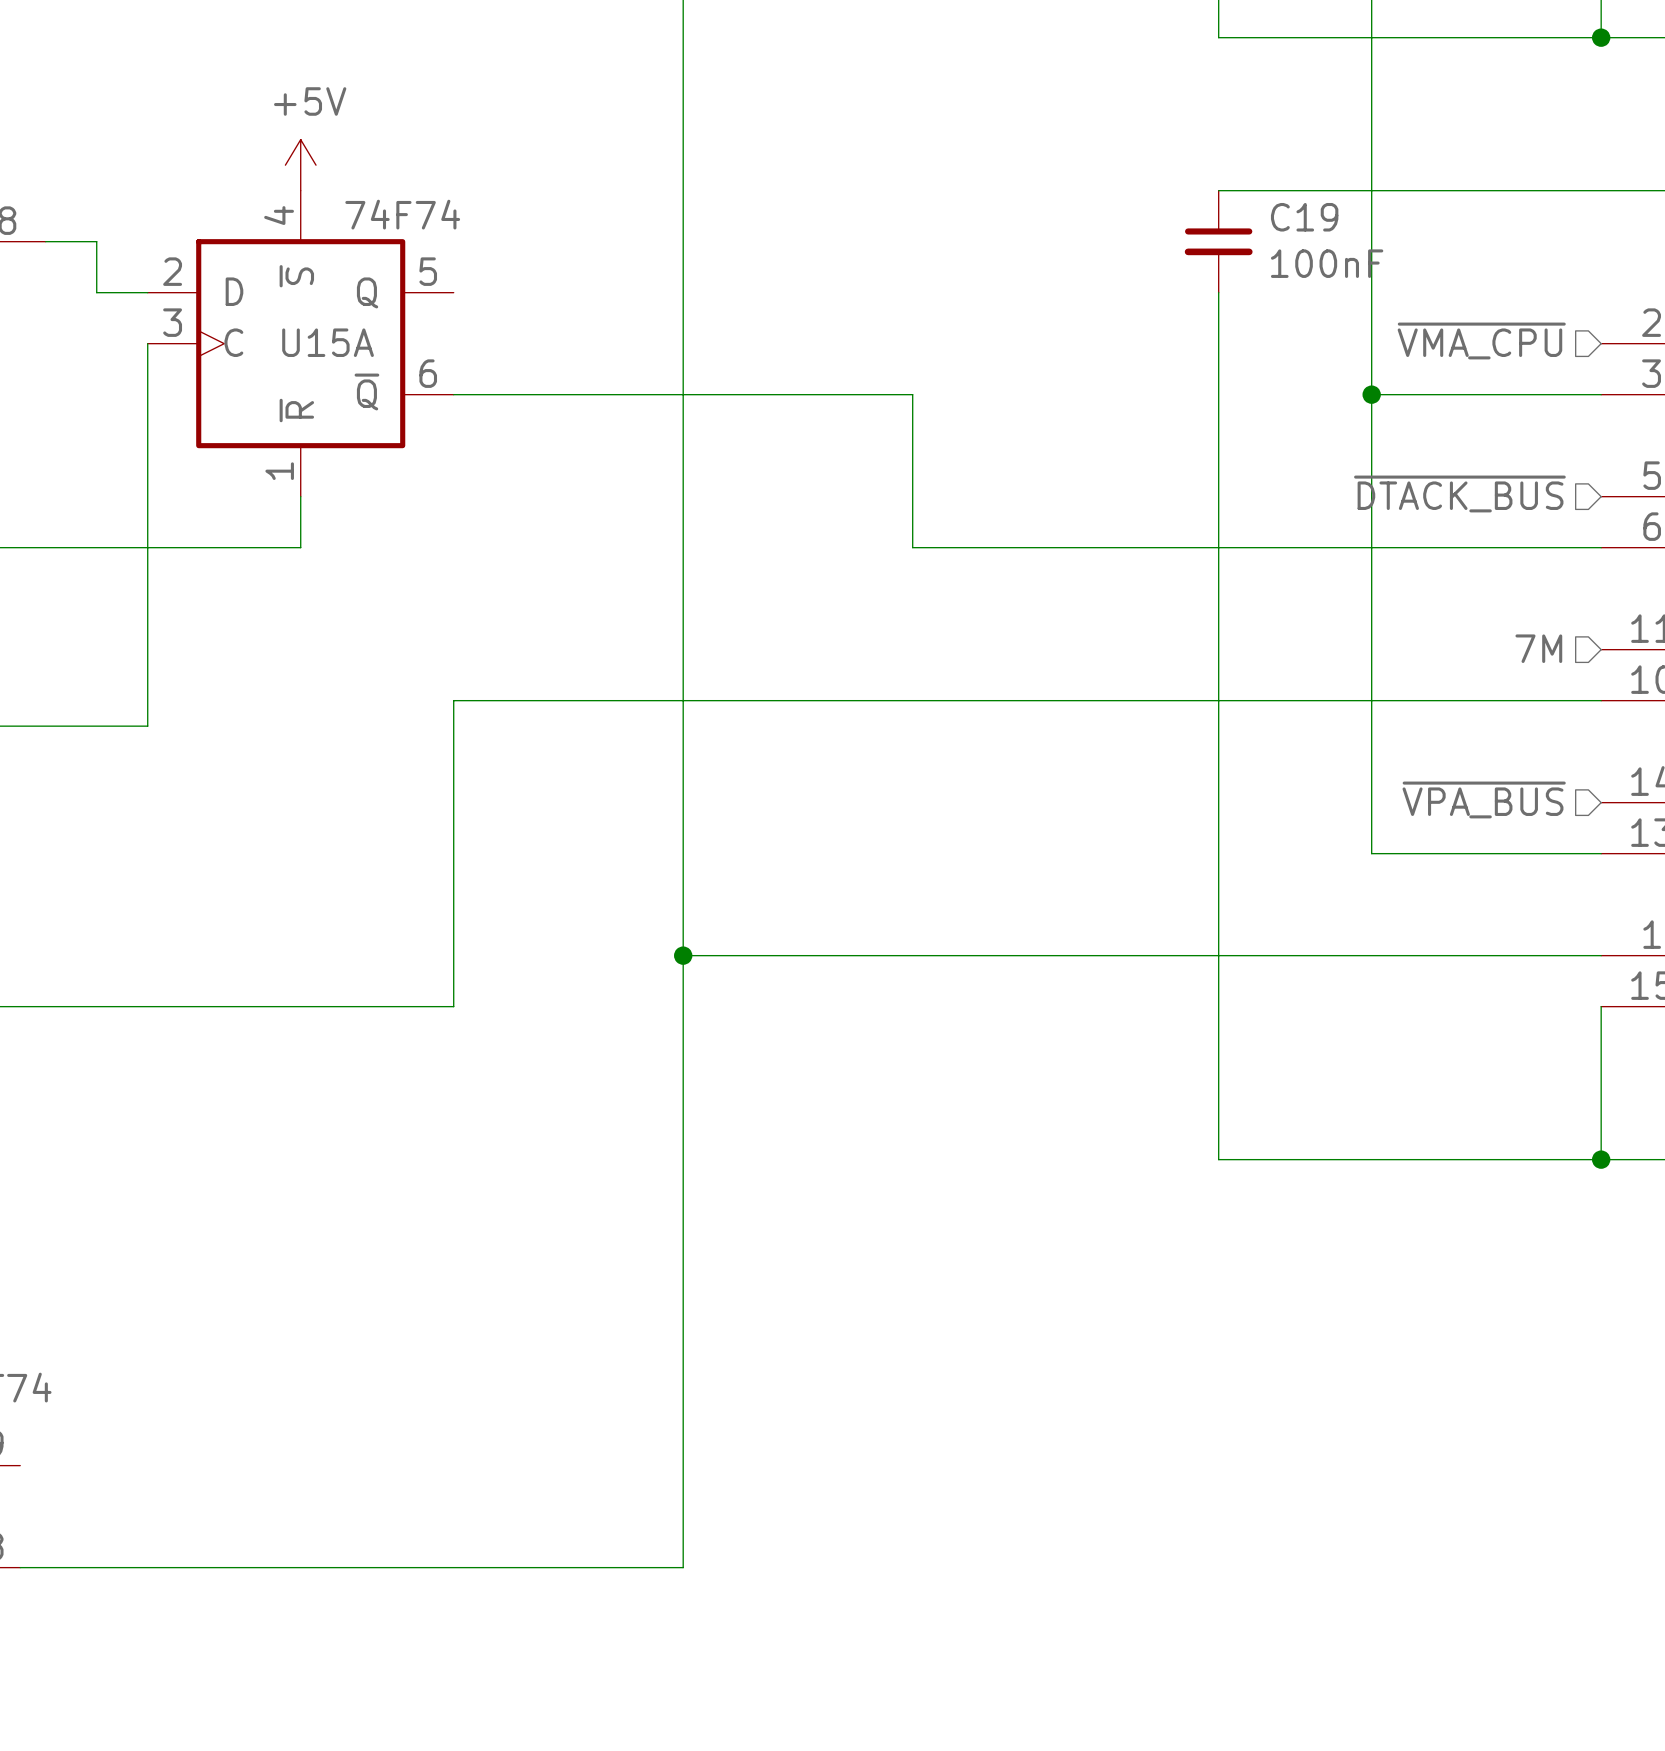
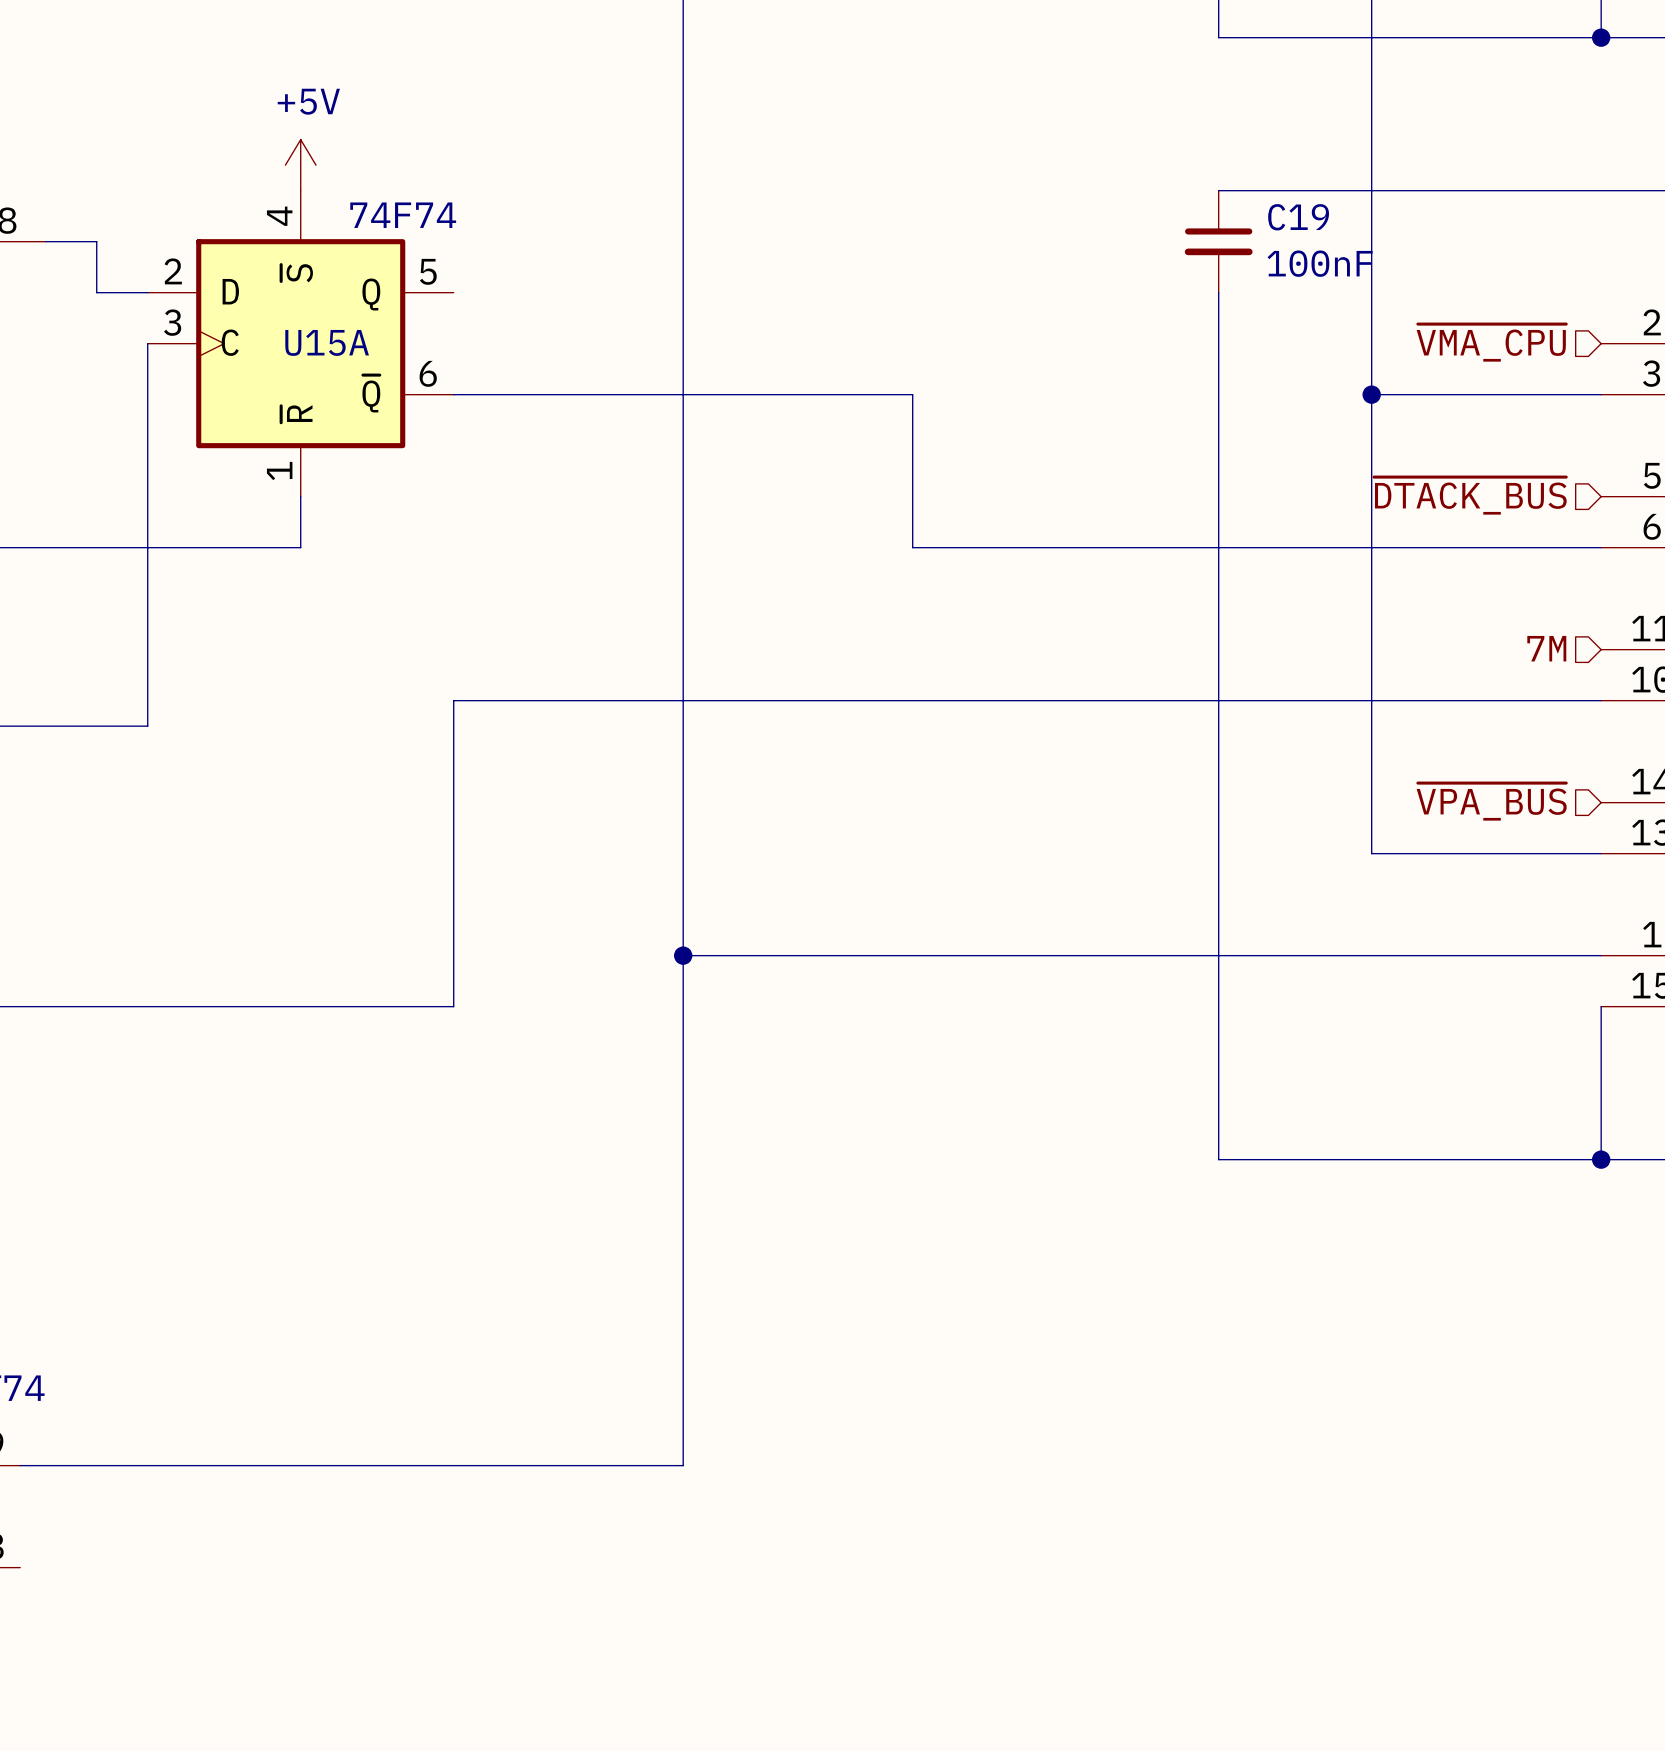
wire: (683, 1465) (683, 1567) (20, 1567) -> (683, 1465) (20, 1465)

